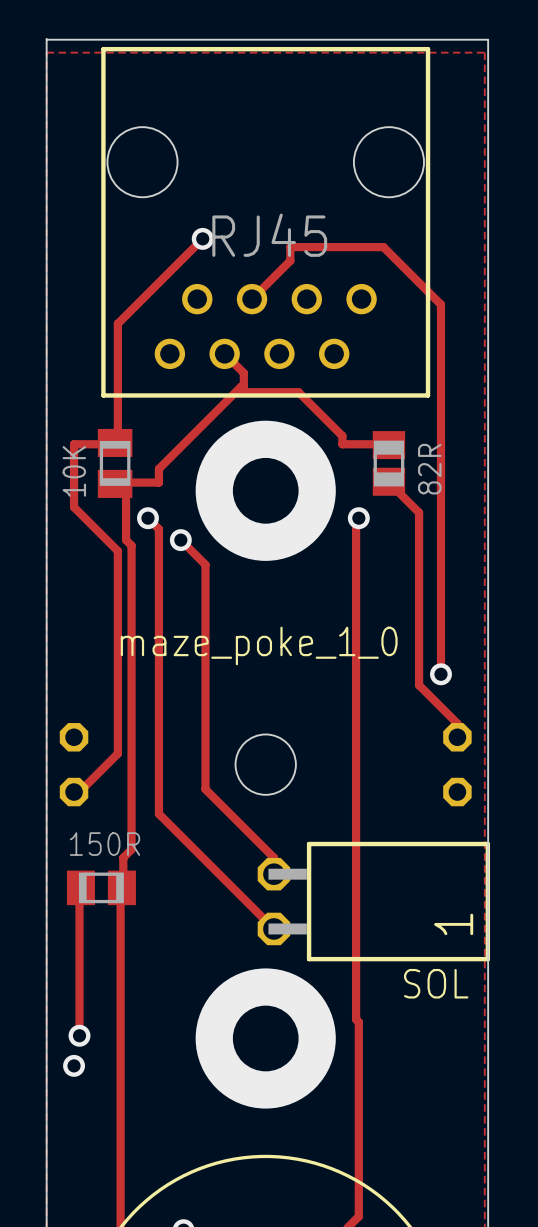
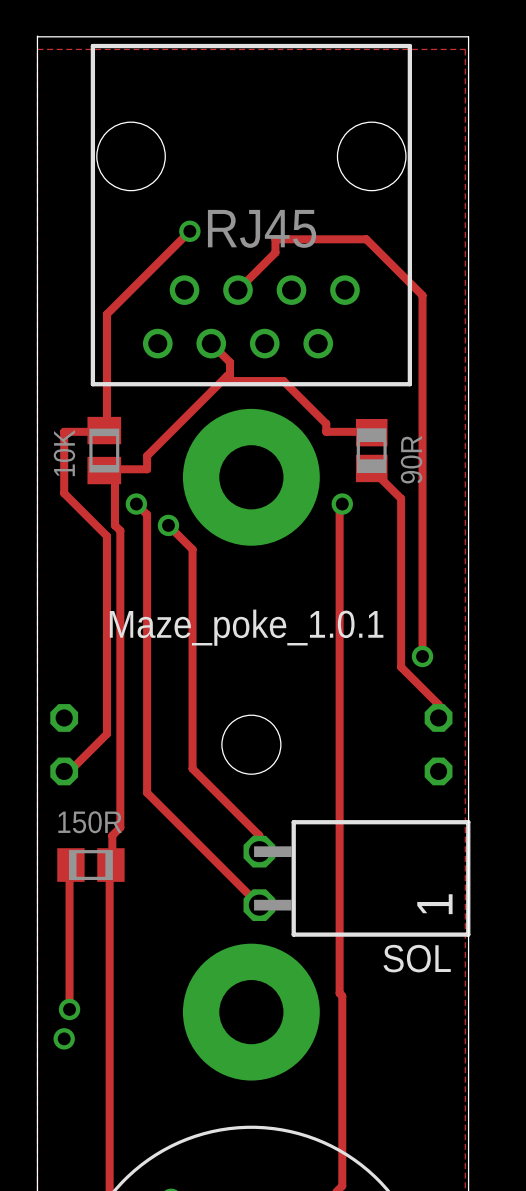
part value: 82R (429, 469) -> 90R (411, 459)
text: maze_poke_1_0 (259, 645) -> Maze_poke_1.0.1 (246, 627)

